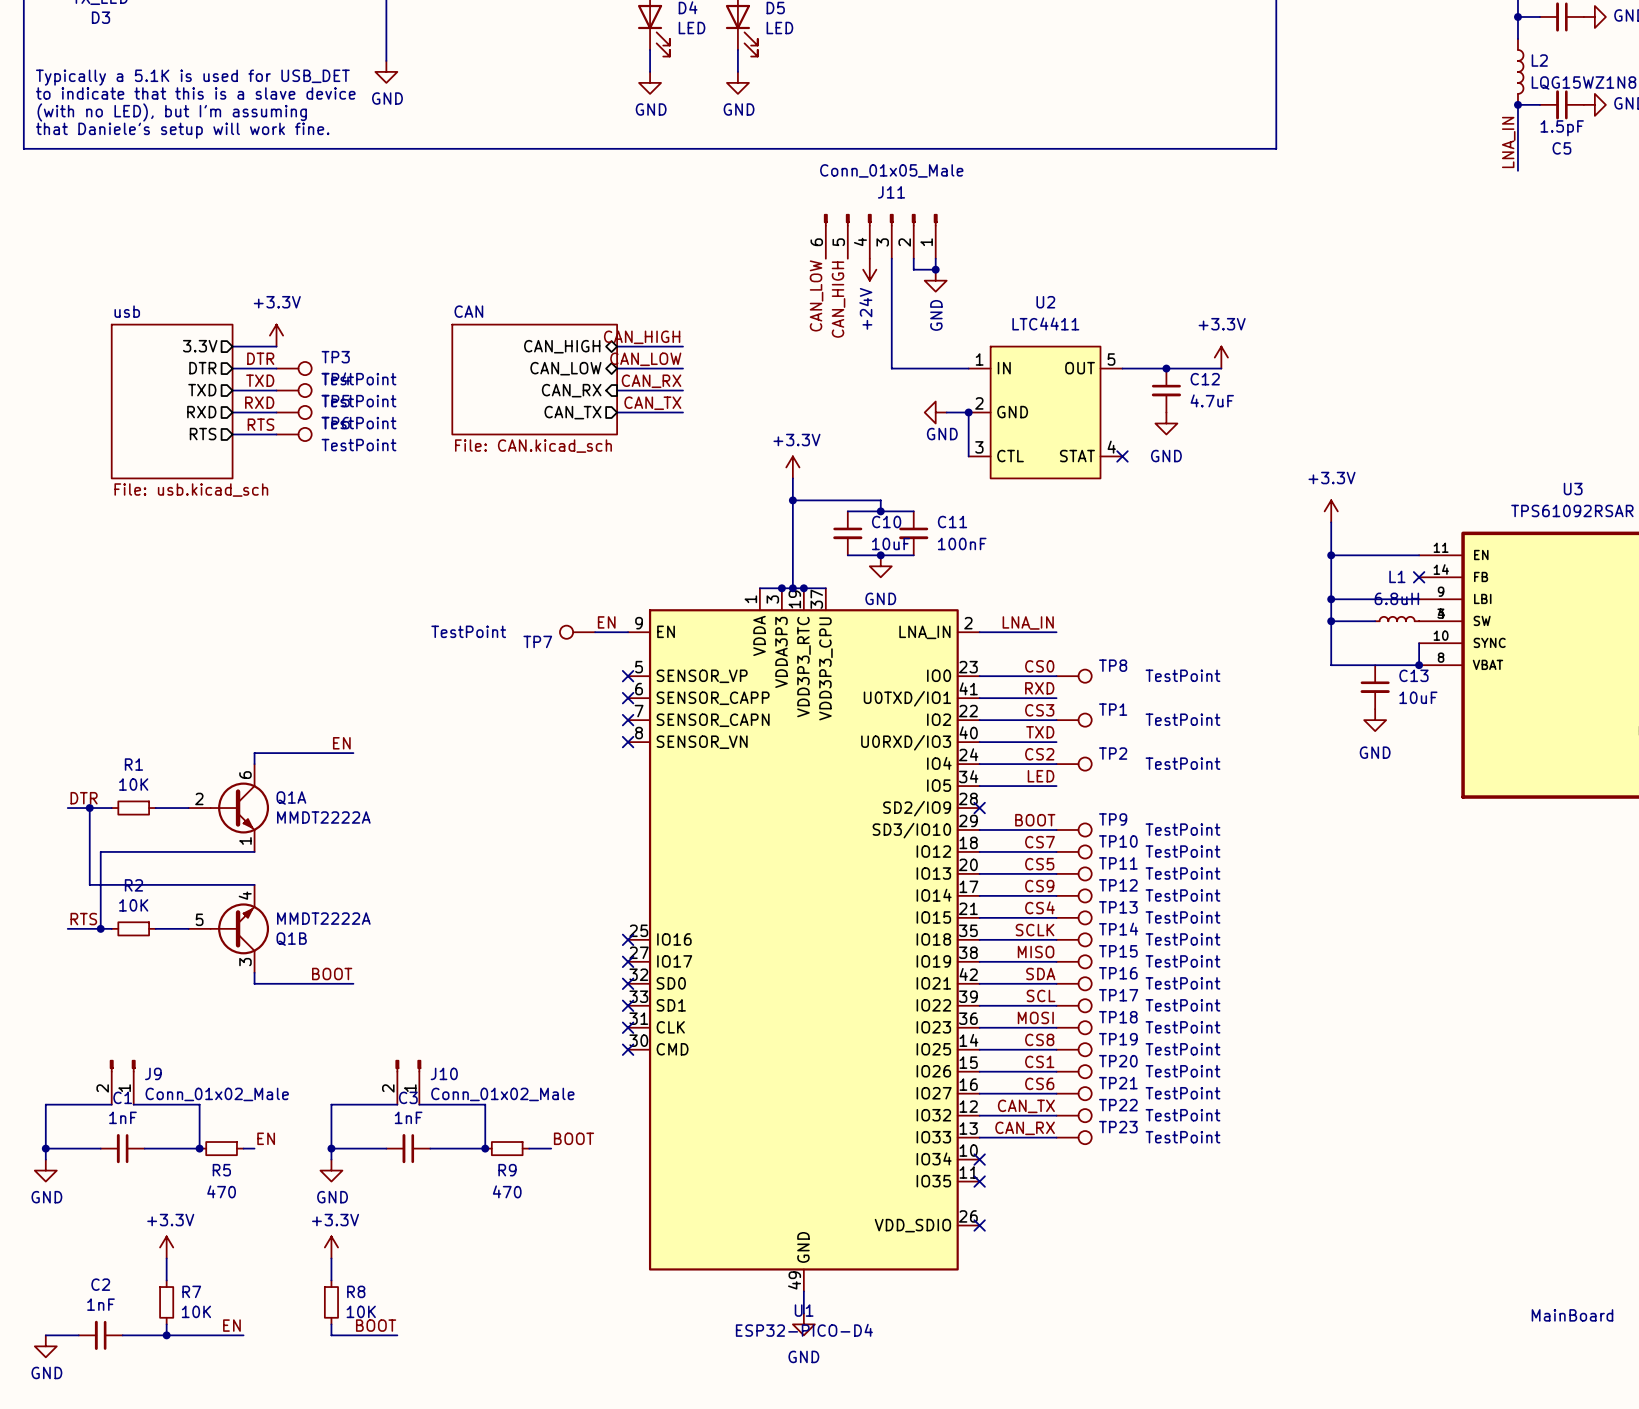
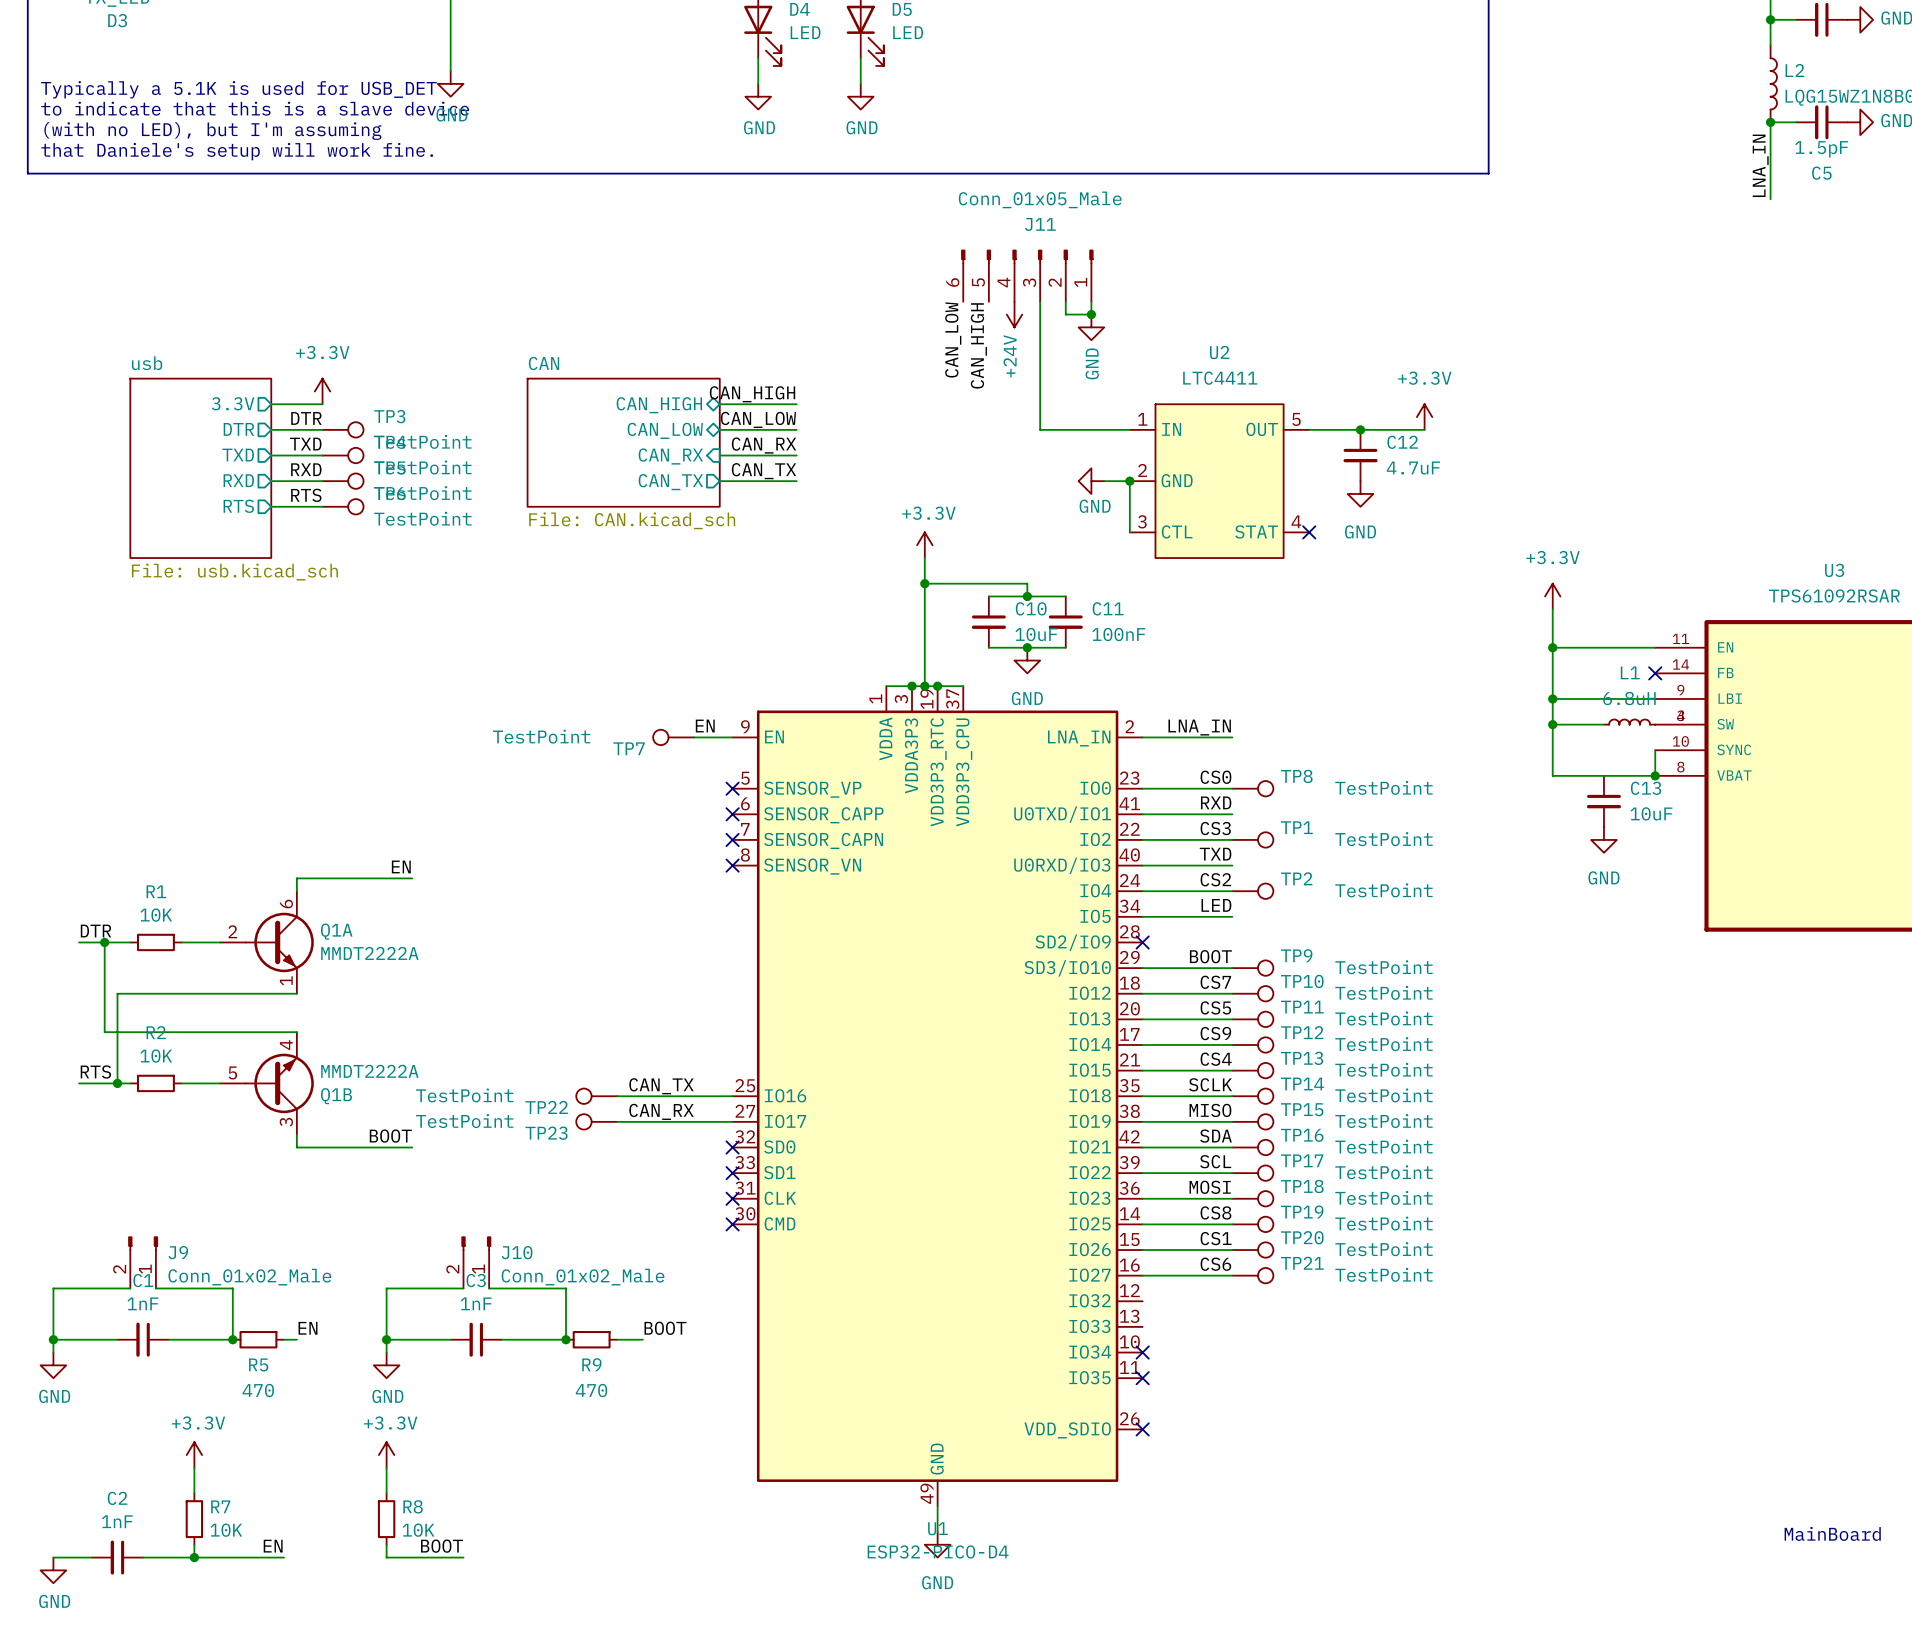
label: none -> CAN_TX (661, 1086)
wire: none -> (617, 1096) (732, 1096)
no-connect mark: (628, 939) -> none
label: none -> CAN_RX (661, 1111)
wire: none -> (617, 1121) (732, 1121)
no-connect mark: (628, 961) -> none
label: CAN_TX (1026, 1106) -> none
wire: (979, 1115) (1056, 1115) -> none
TP22 position: (1074, 1115) -> (596, 1096)
TP22 rotation: 0° (1085, 1115) -> 180° (583, 1096)
label: CAN_RX (1025, 1128) -> none
wire: (979, 1137) (1056, 1137) -> none
TP23 position: (1074, 1137) -> (596, 1121)
TP23 rotation: 0° (1085, 1137) -> 180° (583, 1121)

